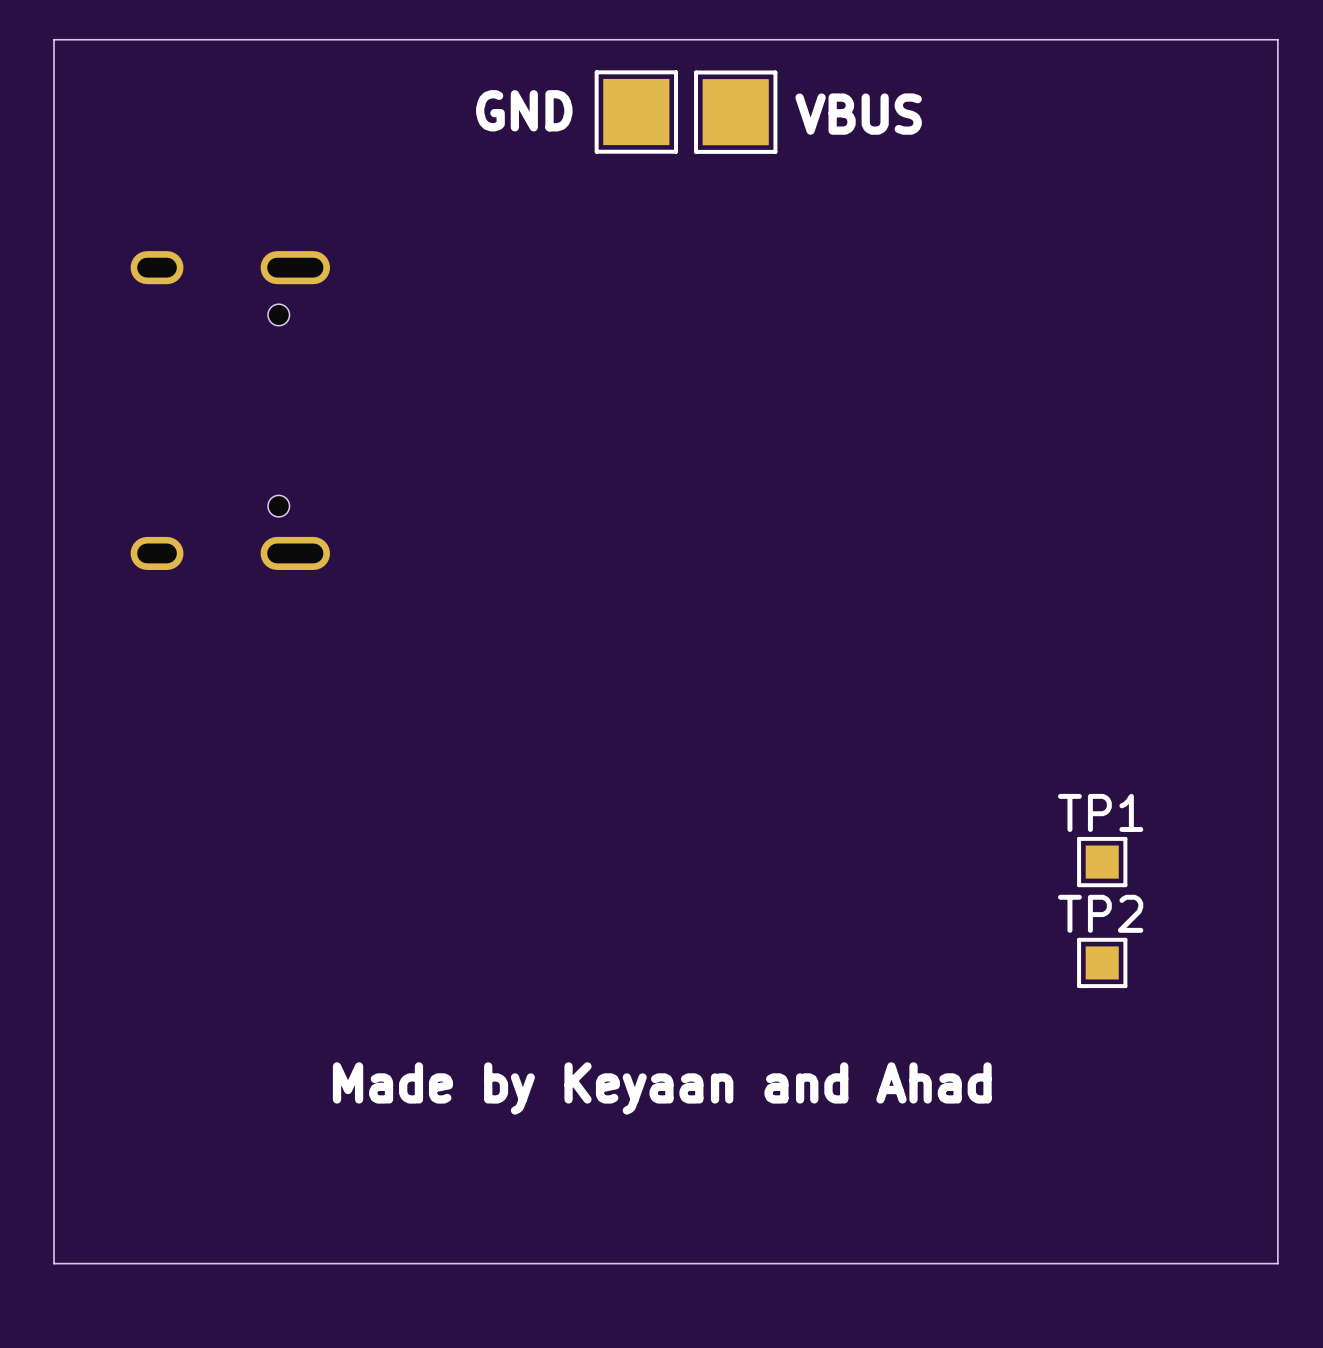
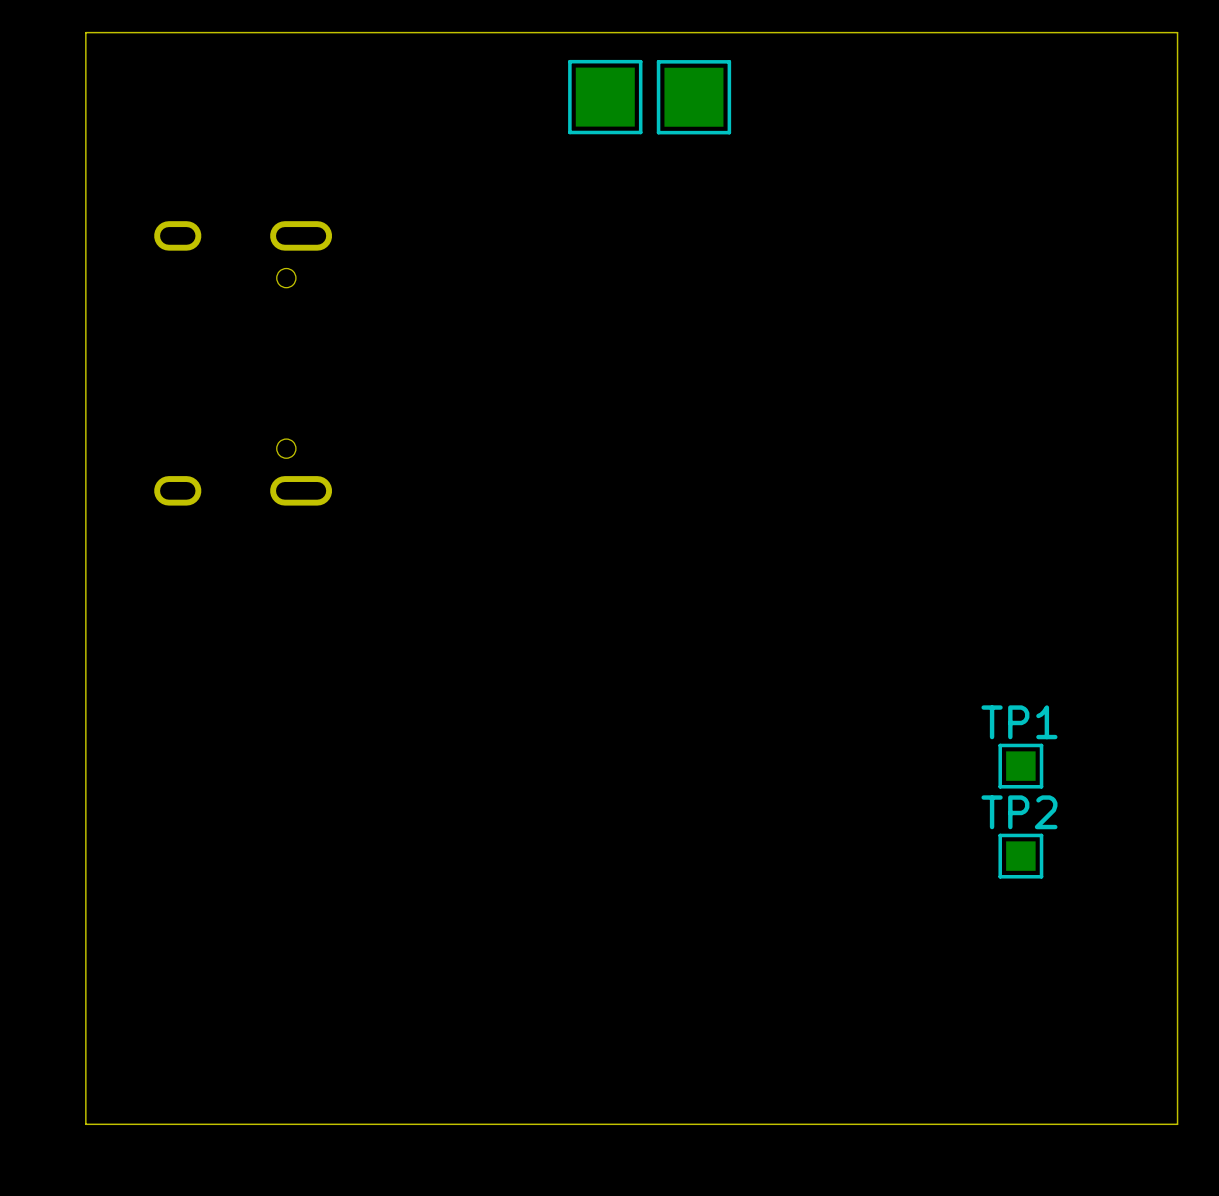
text: GND (524, 110) -> none
text: VBUS (858, 114) -> none
text: Made by Keyaan and Ahad (662, 1088) -> none

